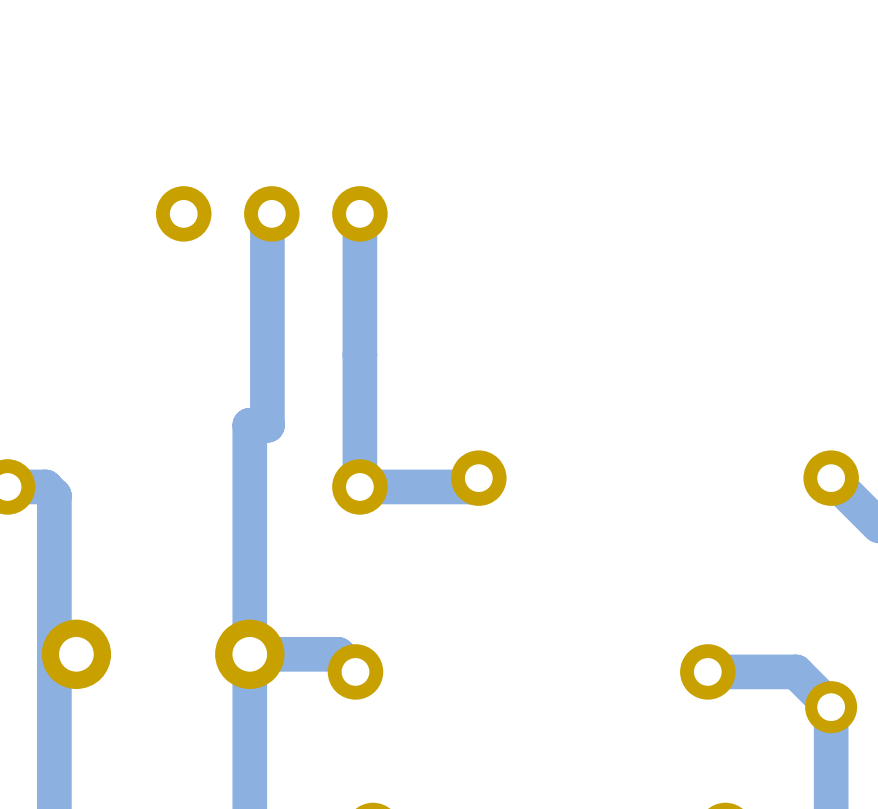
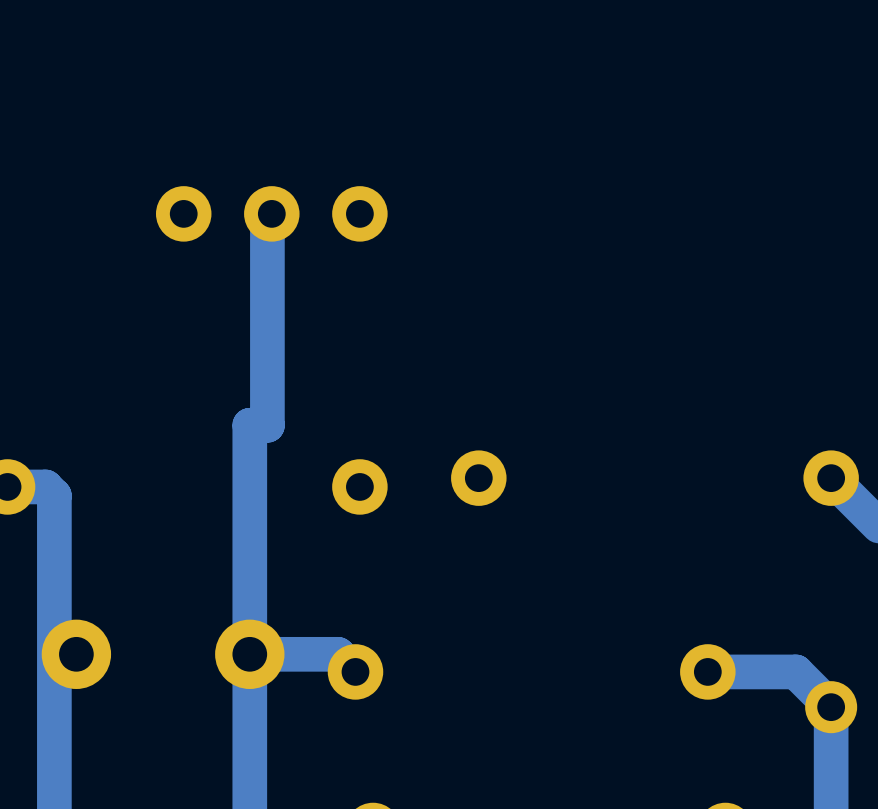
bottom track: (359, 213) (359, 486) (470, 486) (478, 478) -> none

